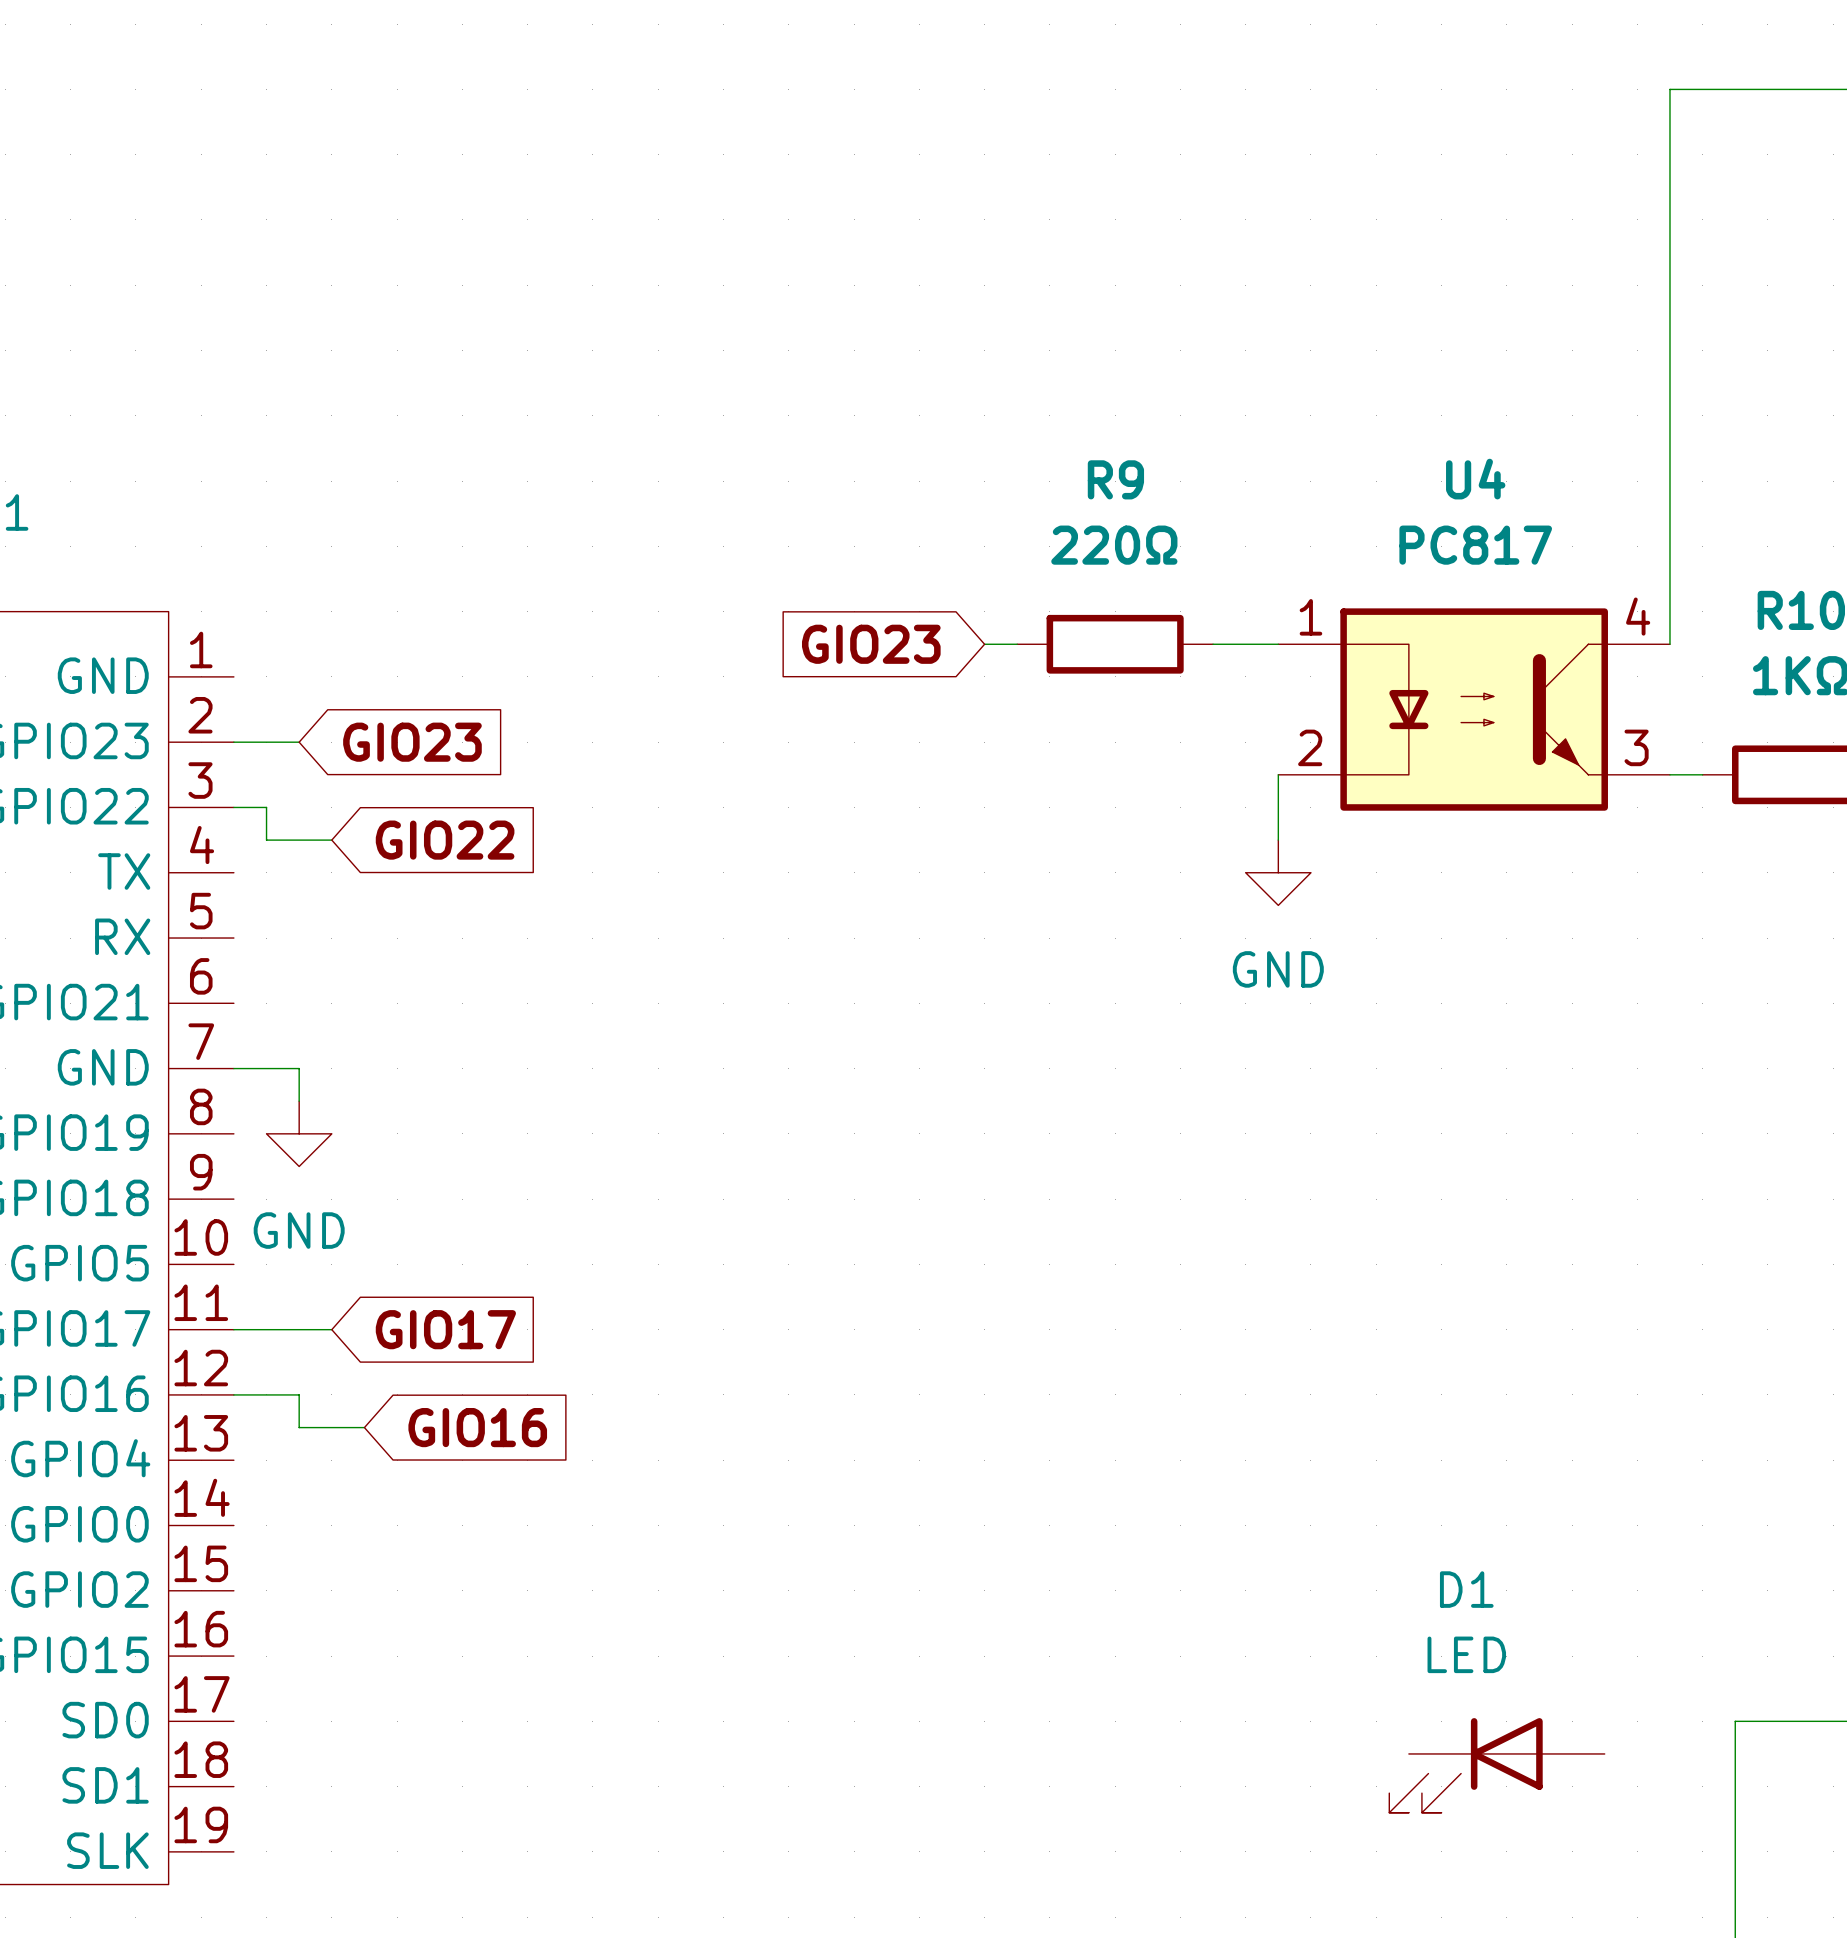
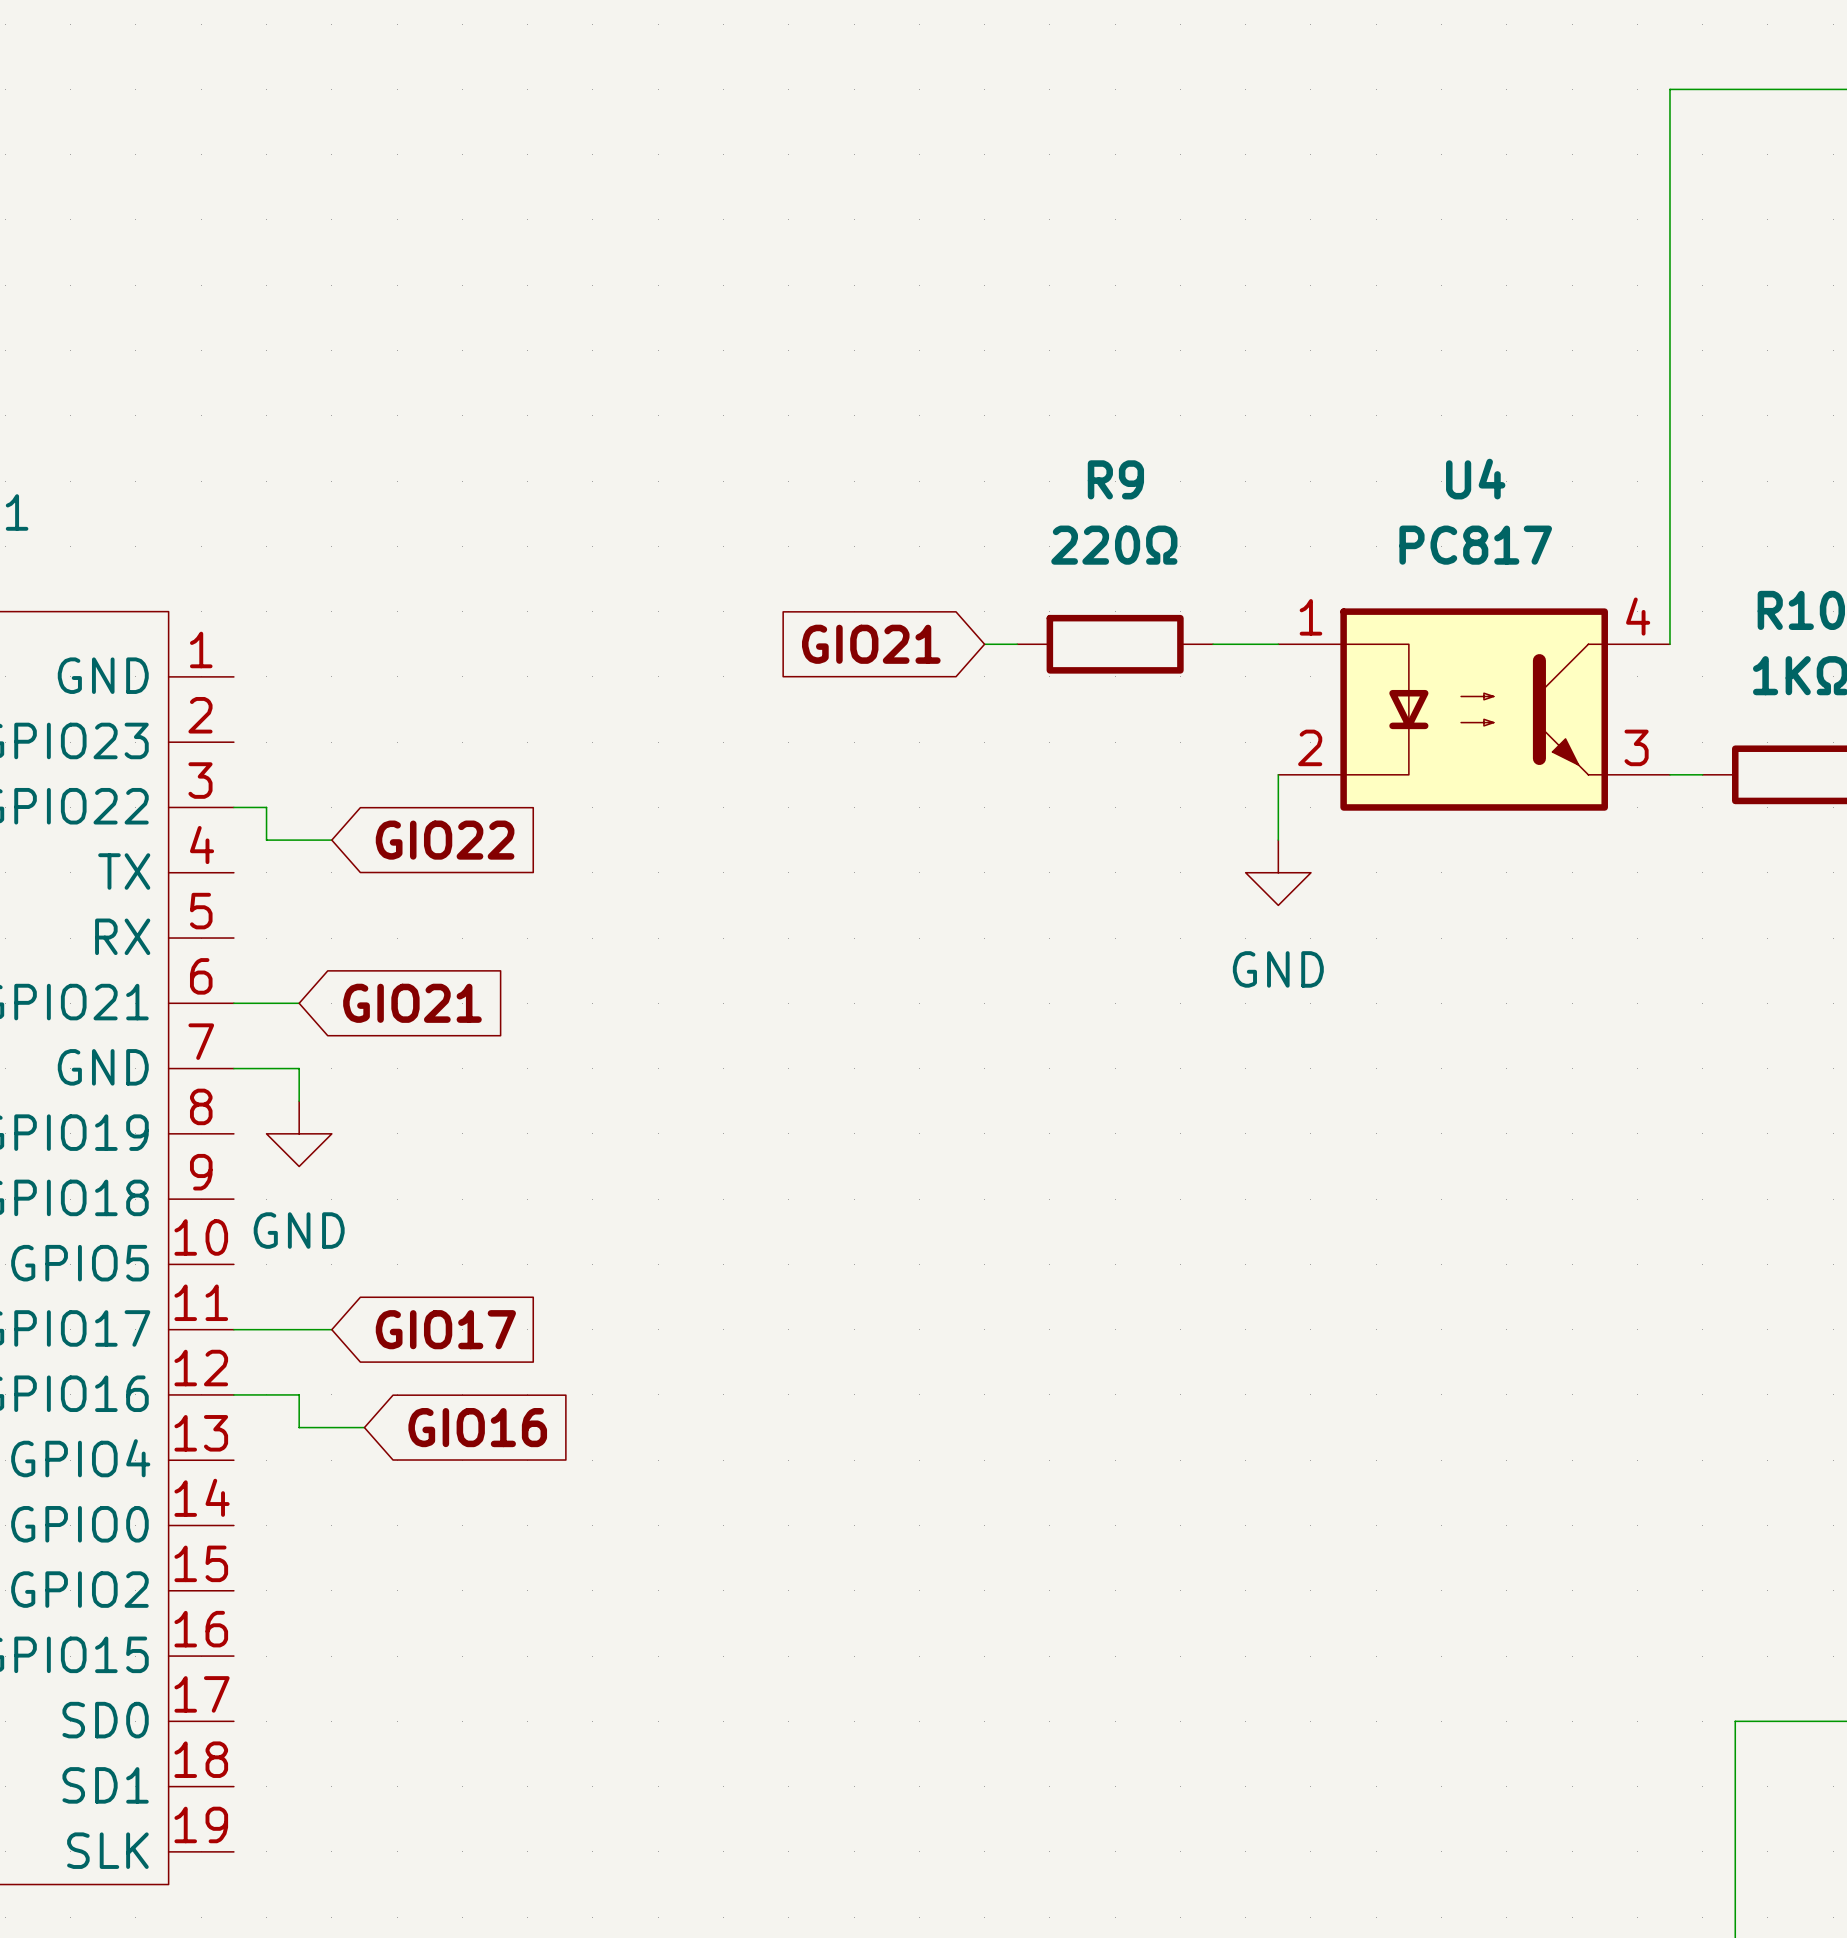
global label: GIO23 (871, 644) -> GIO21 (871, 644)
wire: (233, 742) (299, 742) -> (233, 1003) (299, 1003)
global label: GIO23 (412, 742) -> none
global label: none -> GIO21 (412, 1003)
D1: LED (1497, 1765) -> none

